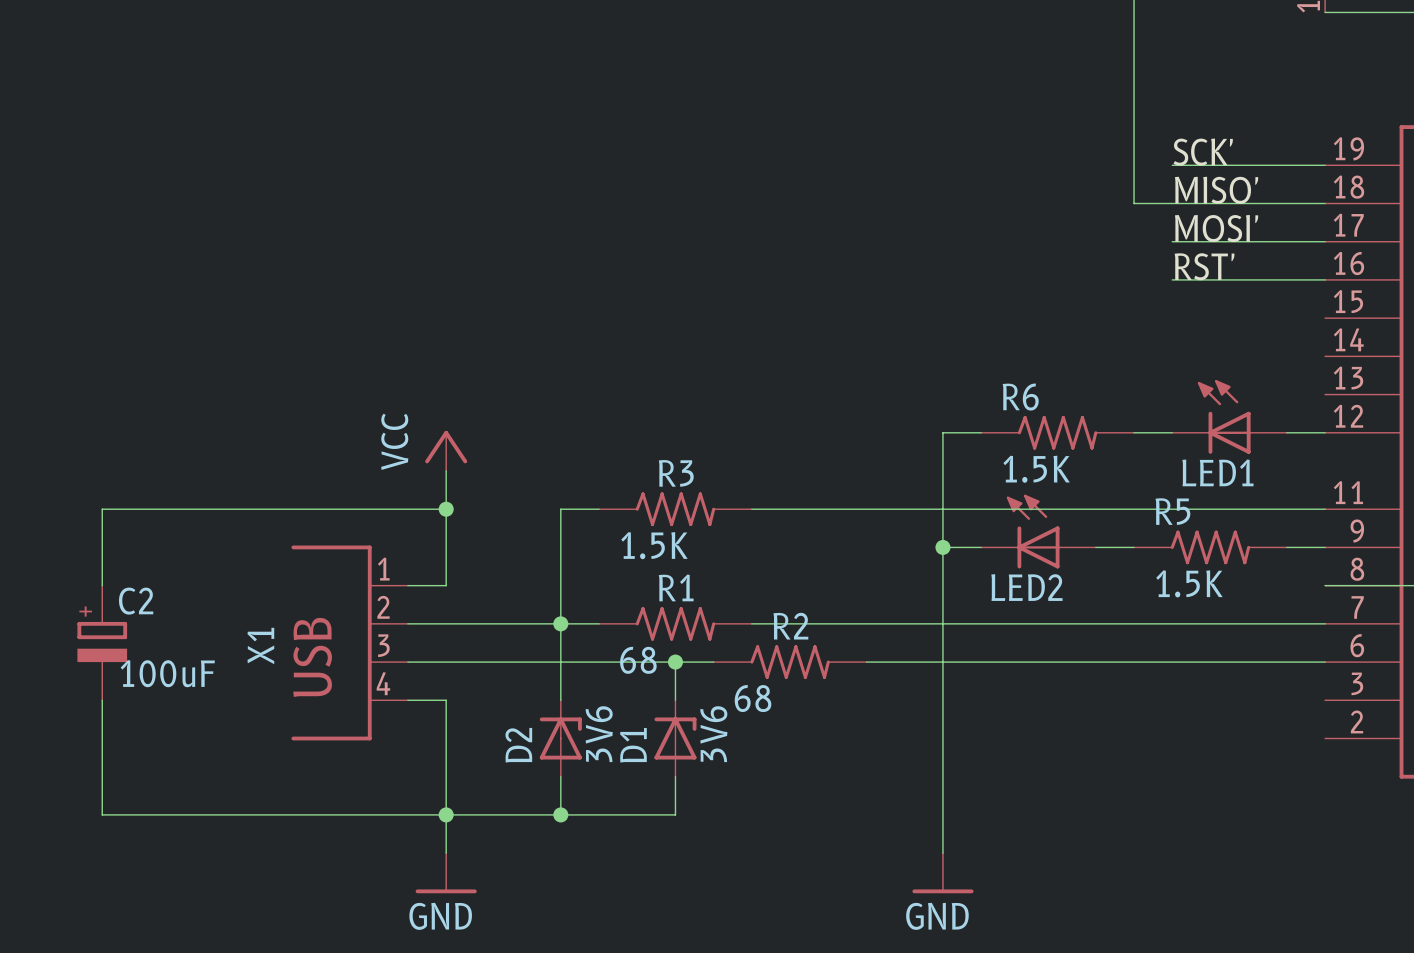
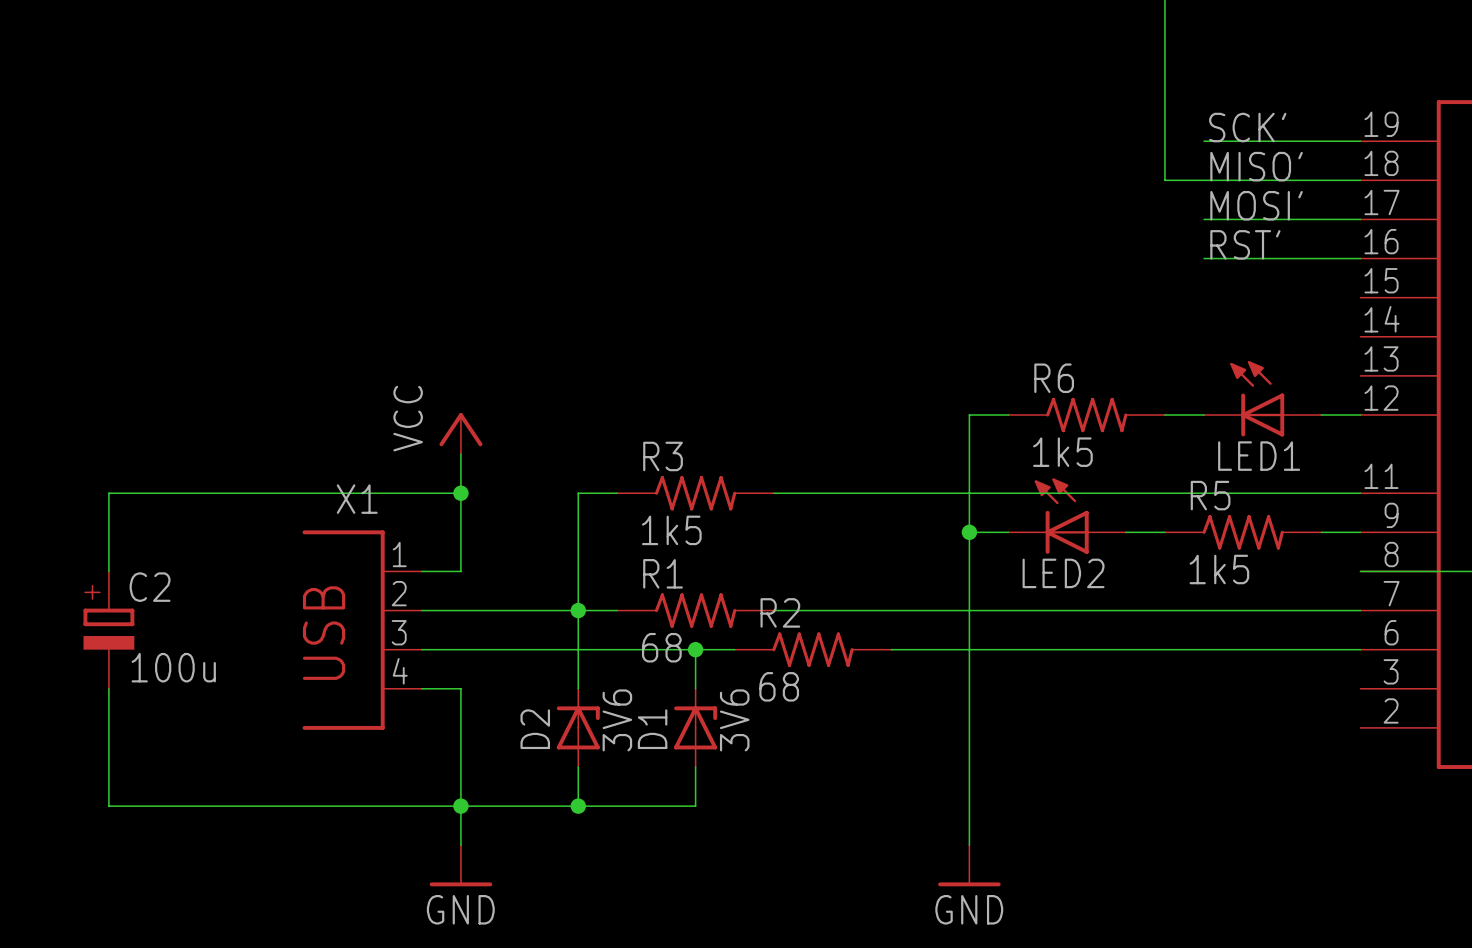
R6 value: 1.5K (1036, 469) -> 1k5 (1062, 452)
R3 name position: R3 (676, 473) -> R3 (663, 456)
R3 value: 1.5K (654, 545) -> 1k5 (671, 530)
R5 value: 1.5K (1189, 583) -> 1k5 (1219, 569)
R1 name position: R1 (676, 587) -> R1 (663, 573)
R2 name position: R2 (790, 626) -> R2 (780, 612)
X1 name rotation: 0° (260, 646) -> 90° clockwise (357, 499)
X1 name position: X1 (260, 646) -> X1 (357, 499)
C2 value: 100uF (167, 673) -> 100u (173, 667)

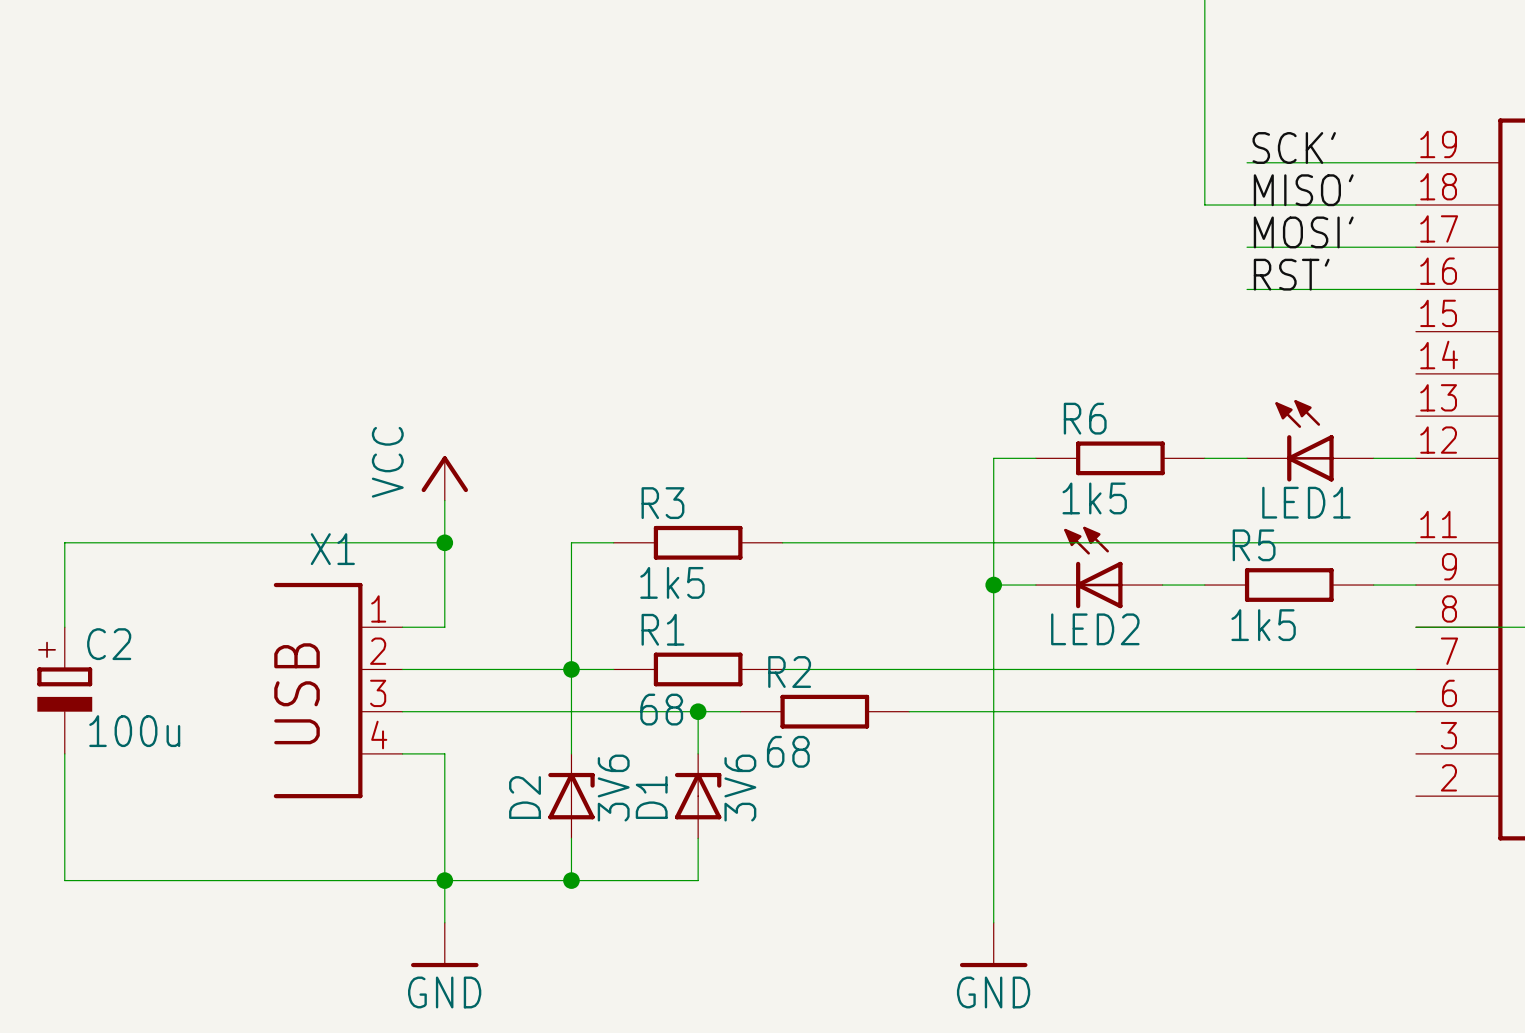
R6 symbol: [1008, 397, 1165, 433] -> [1035, 441, 1205, 476]
R3 symbol: [617, 476, 774, 511] -> [613, 525, 783, 560]
R5 symbol: [1164, 515, 1322, 550] -> [1204, 568, 1374, 602]
R1 symbol: [617, 593, 774, 628] -> [613, 652, 783, 687]
R2 symbol: [734, 632, 892, 667] -> [740, 694, 910, 729]

